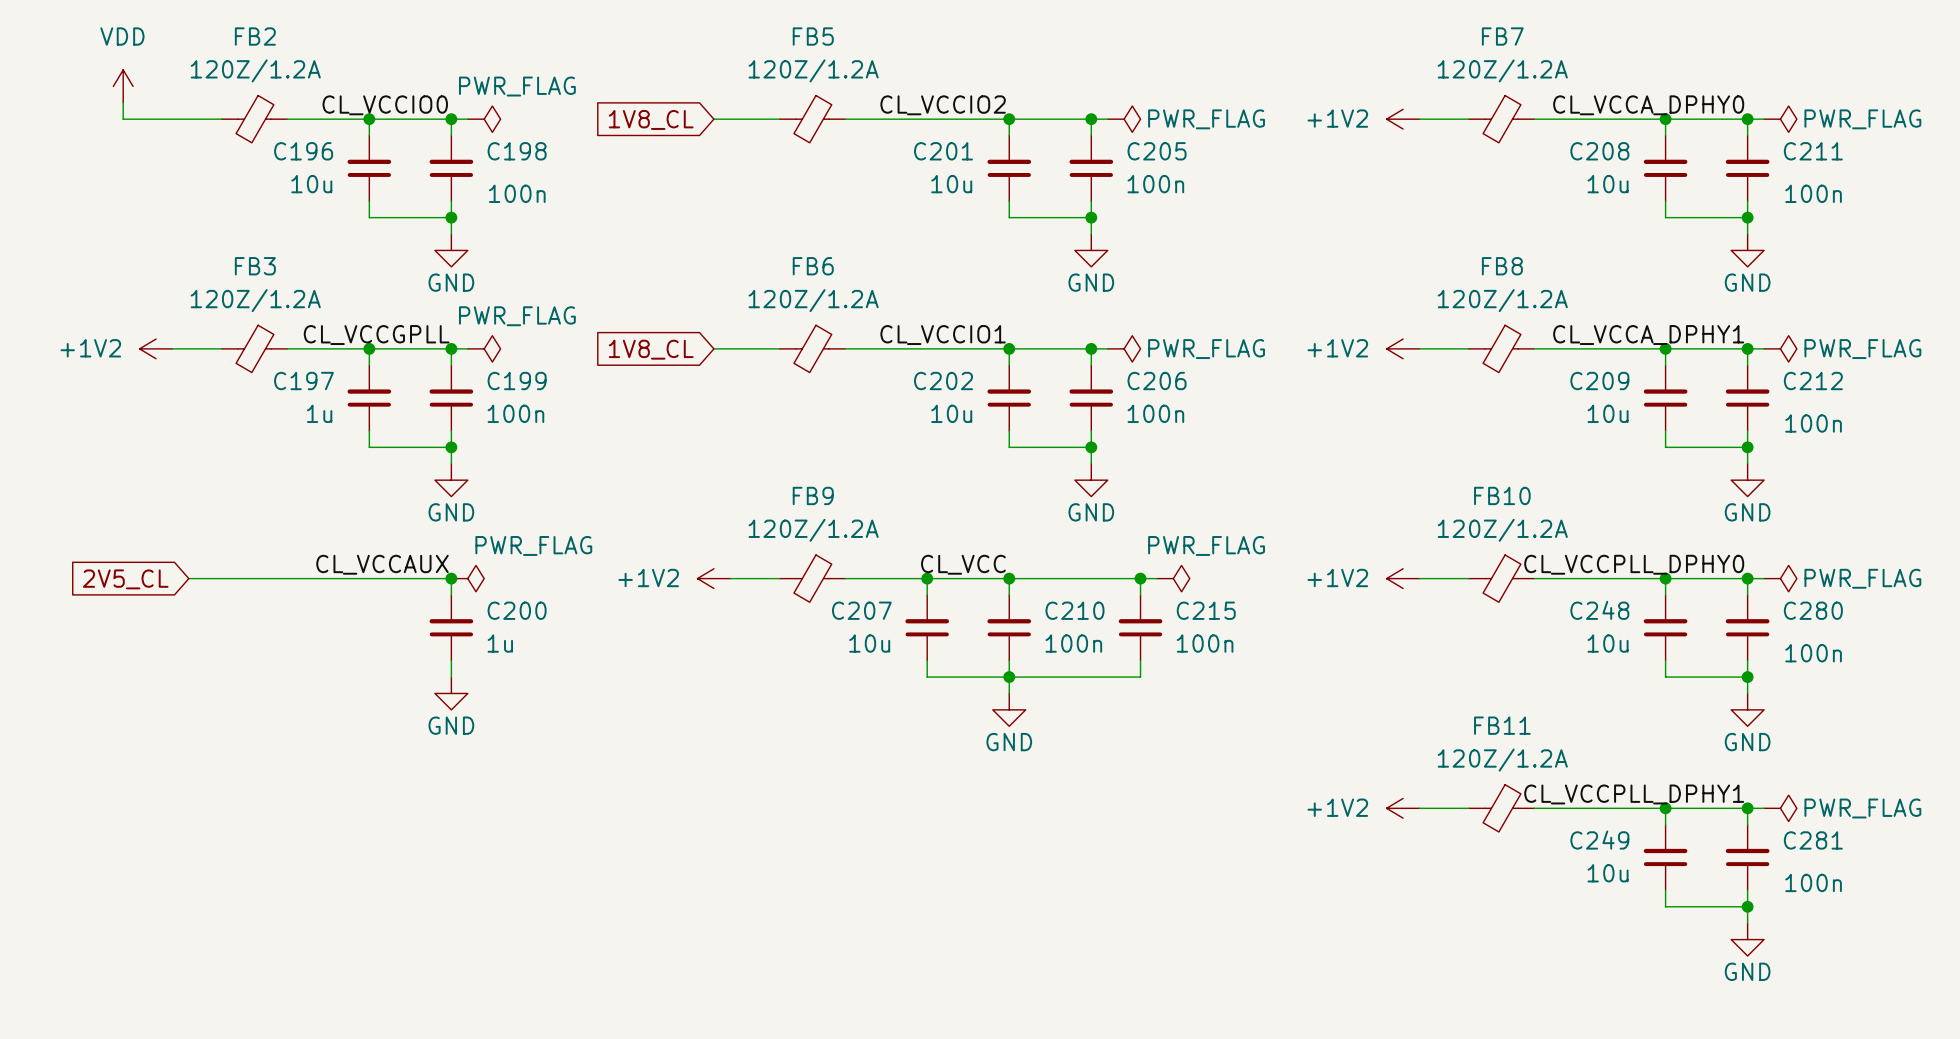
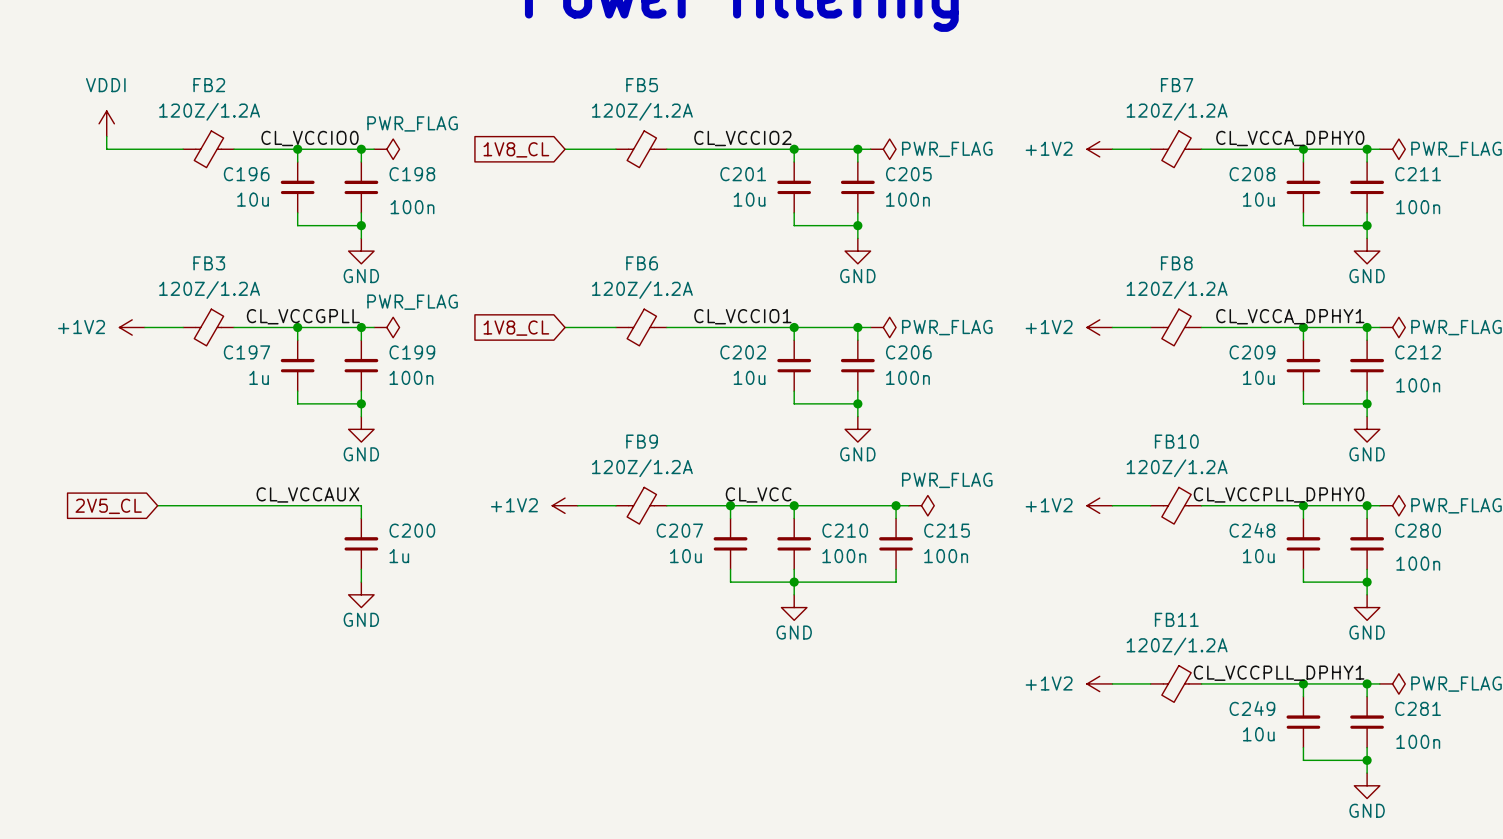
power symbol: VDD (123, 86) -> VDDI (106, 123)
junction: (451, 578) -> none
power symbol: PWR_FLAG (467, 578) -> none

